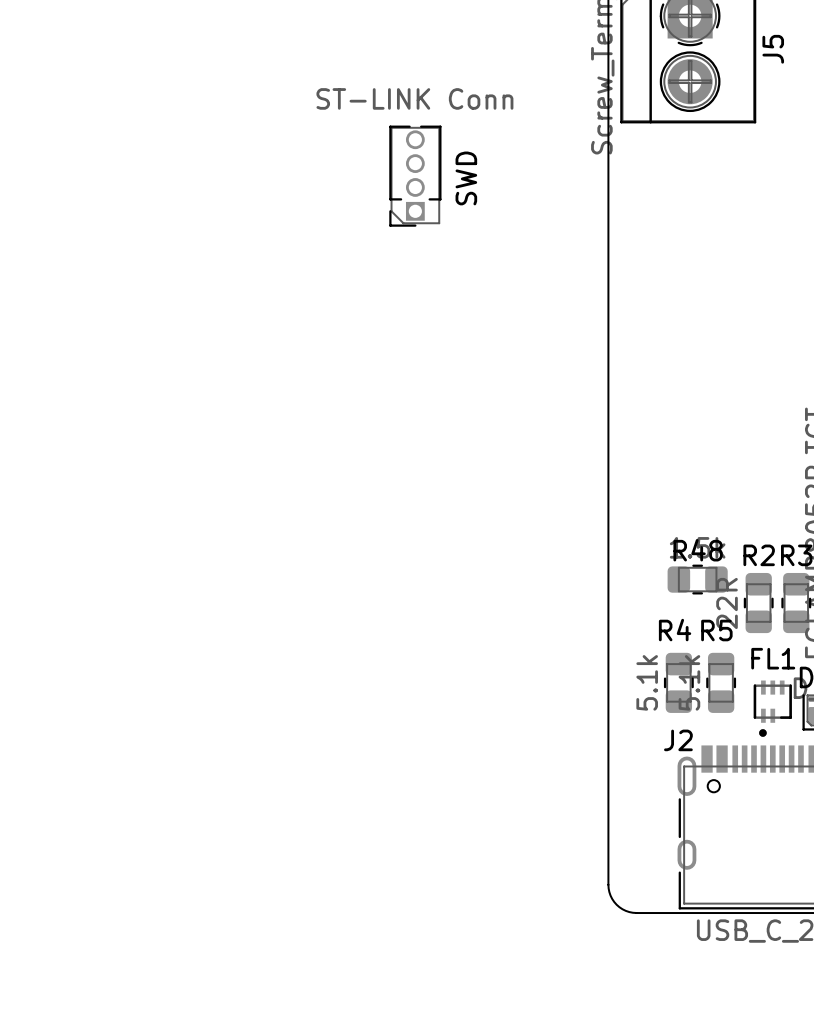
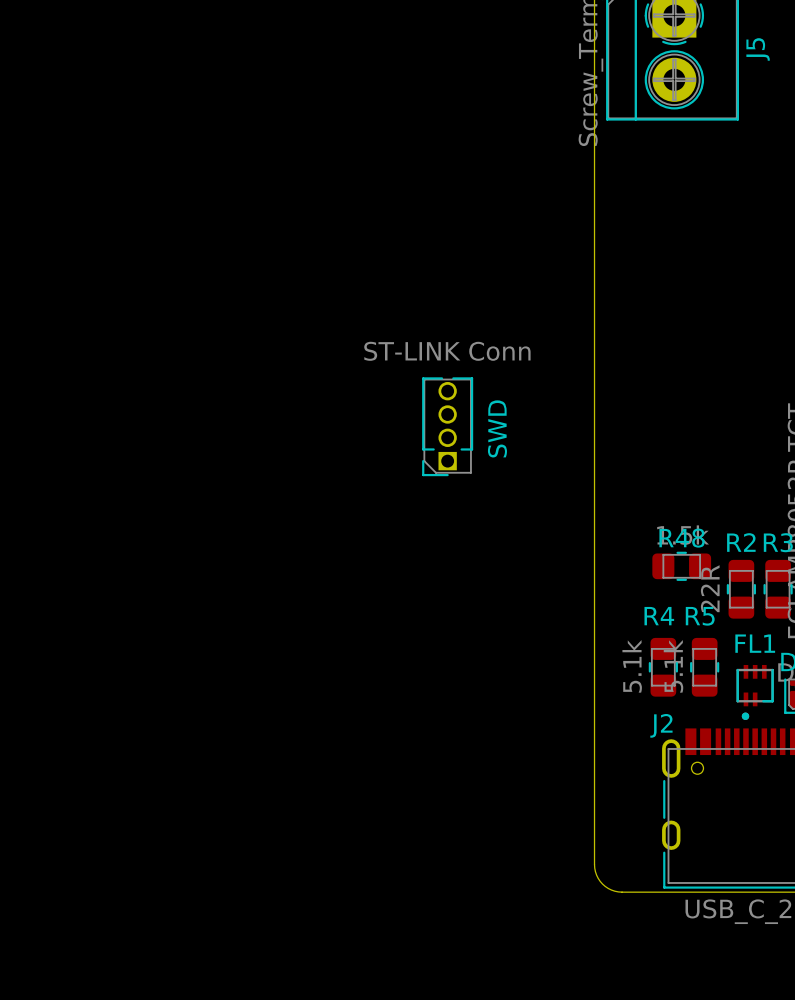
SWD position: (415, 176) -> (447, 426)

